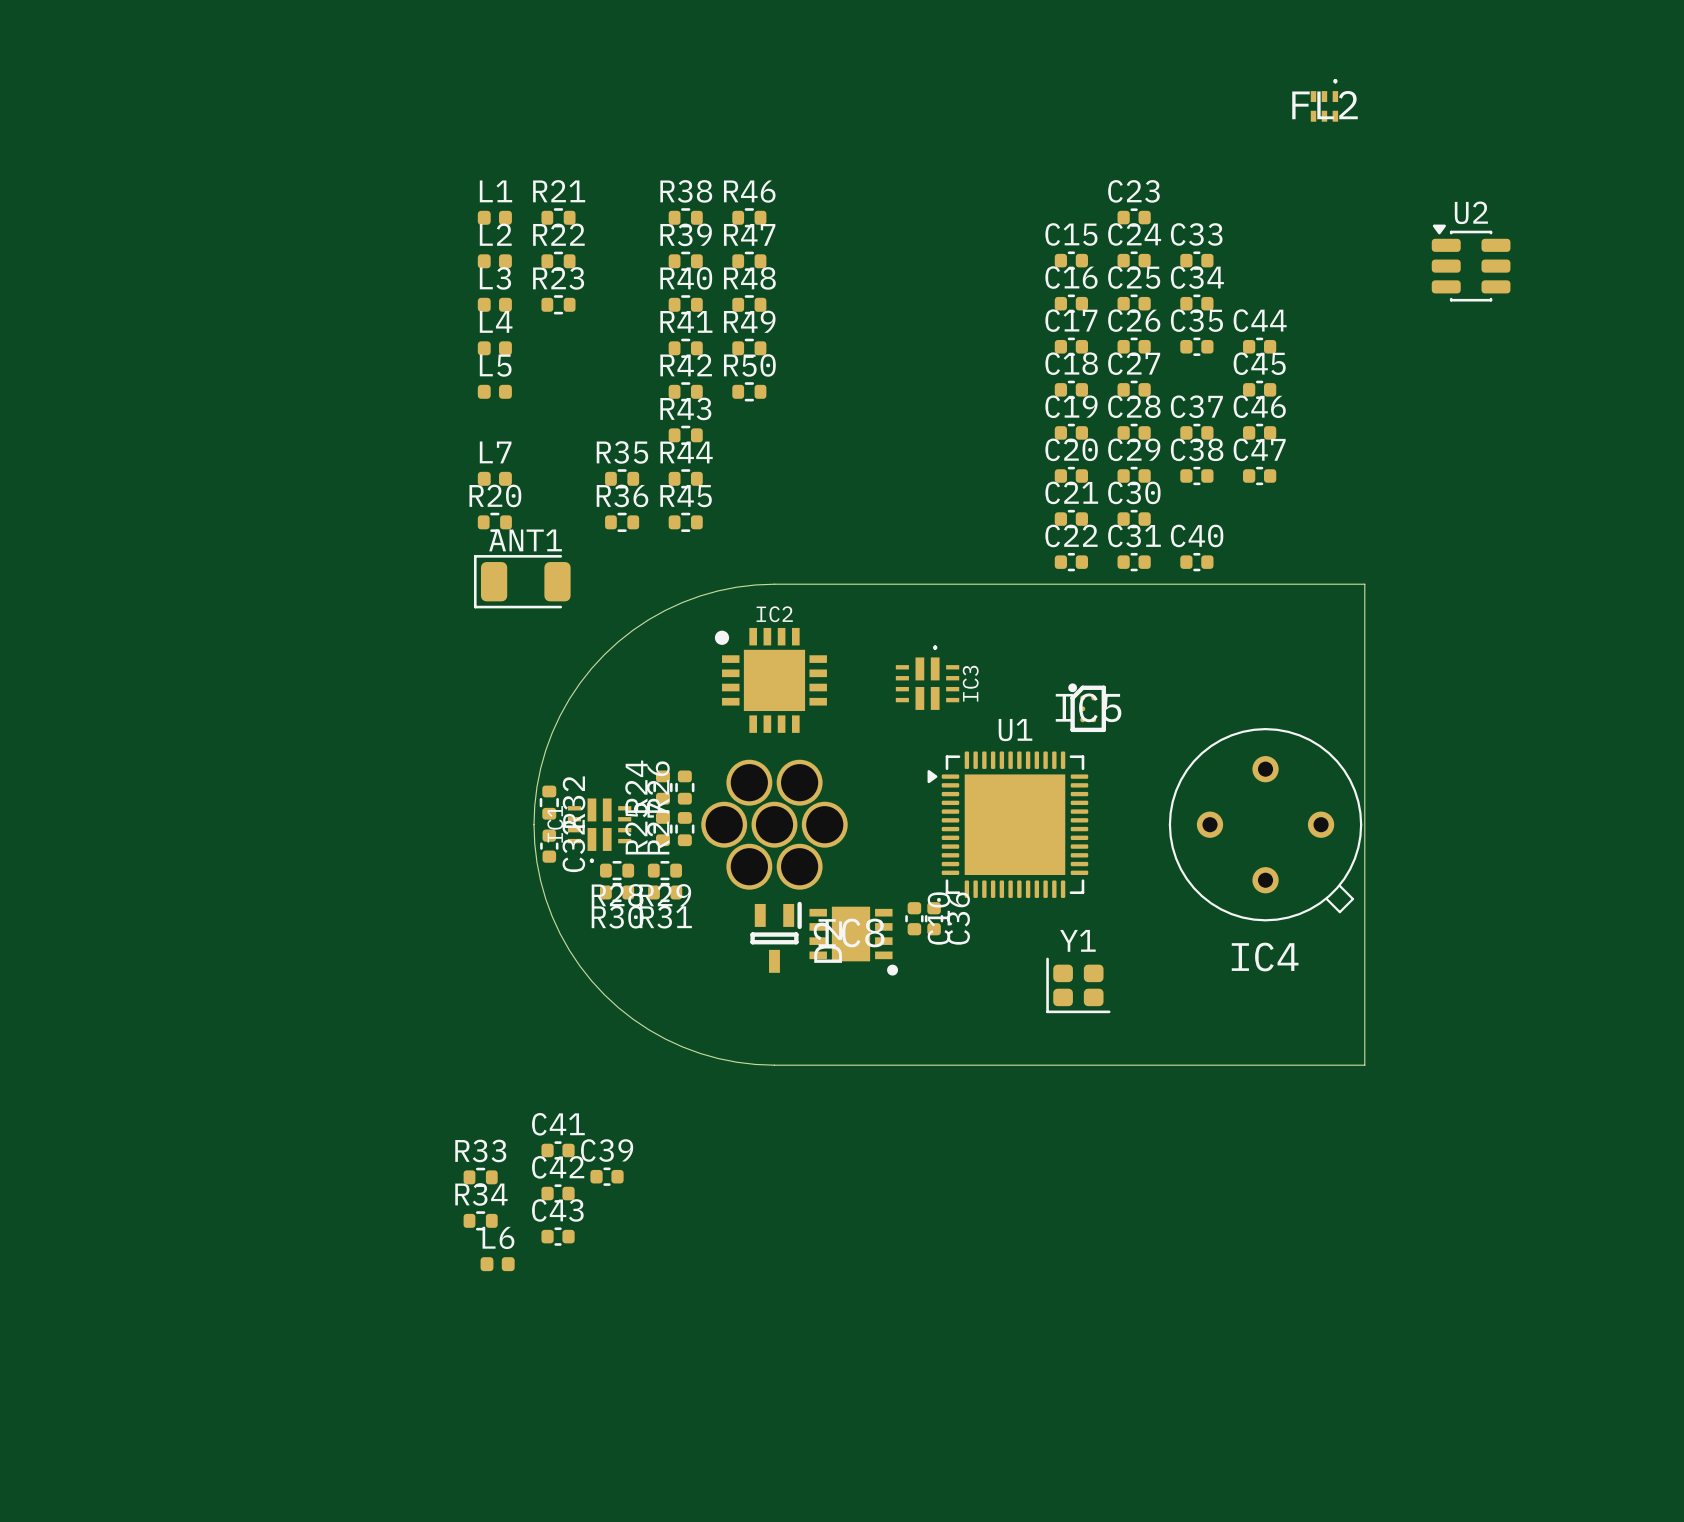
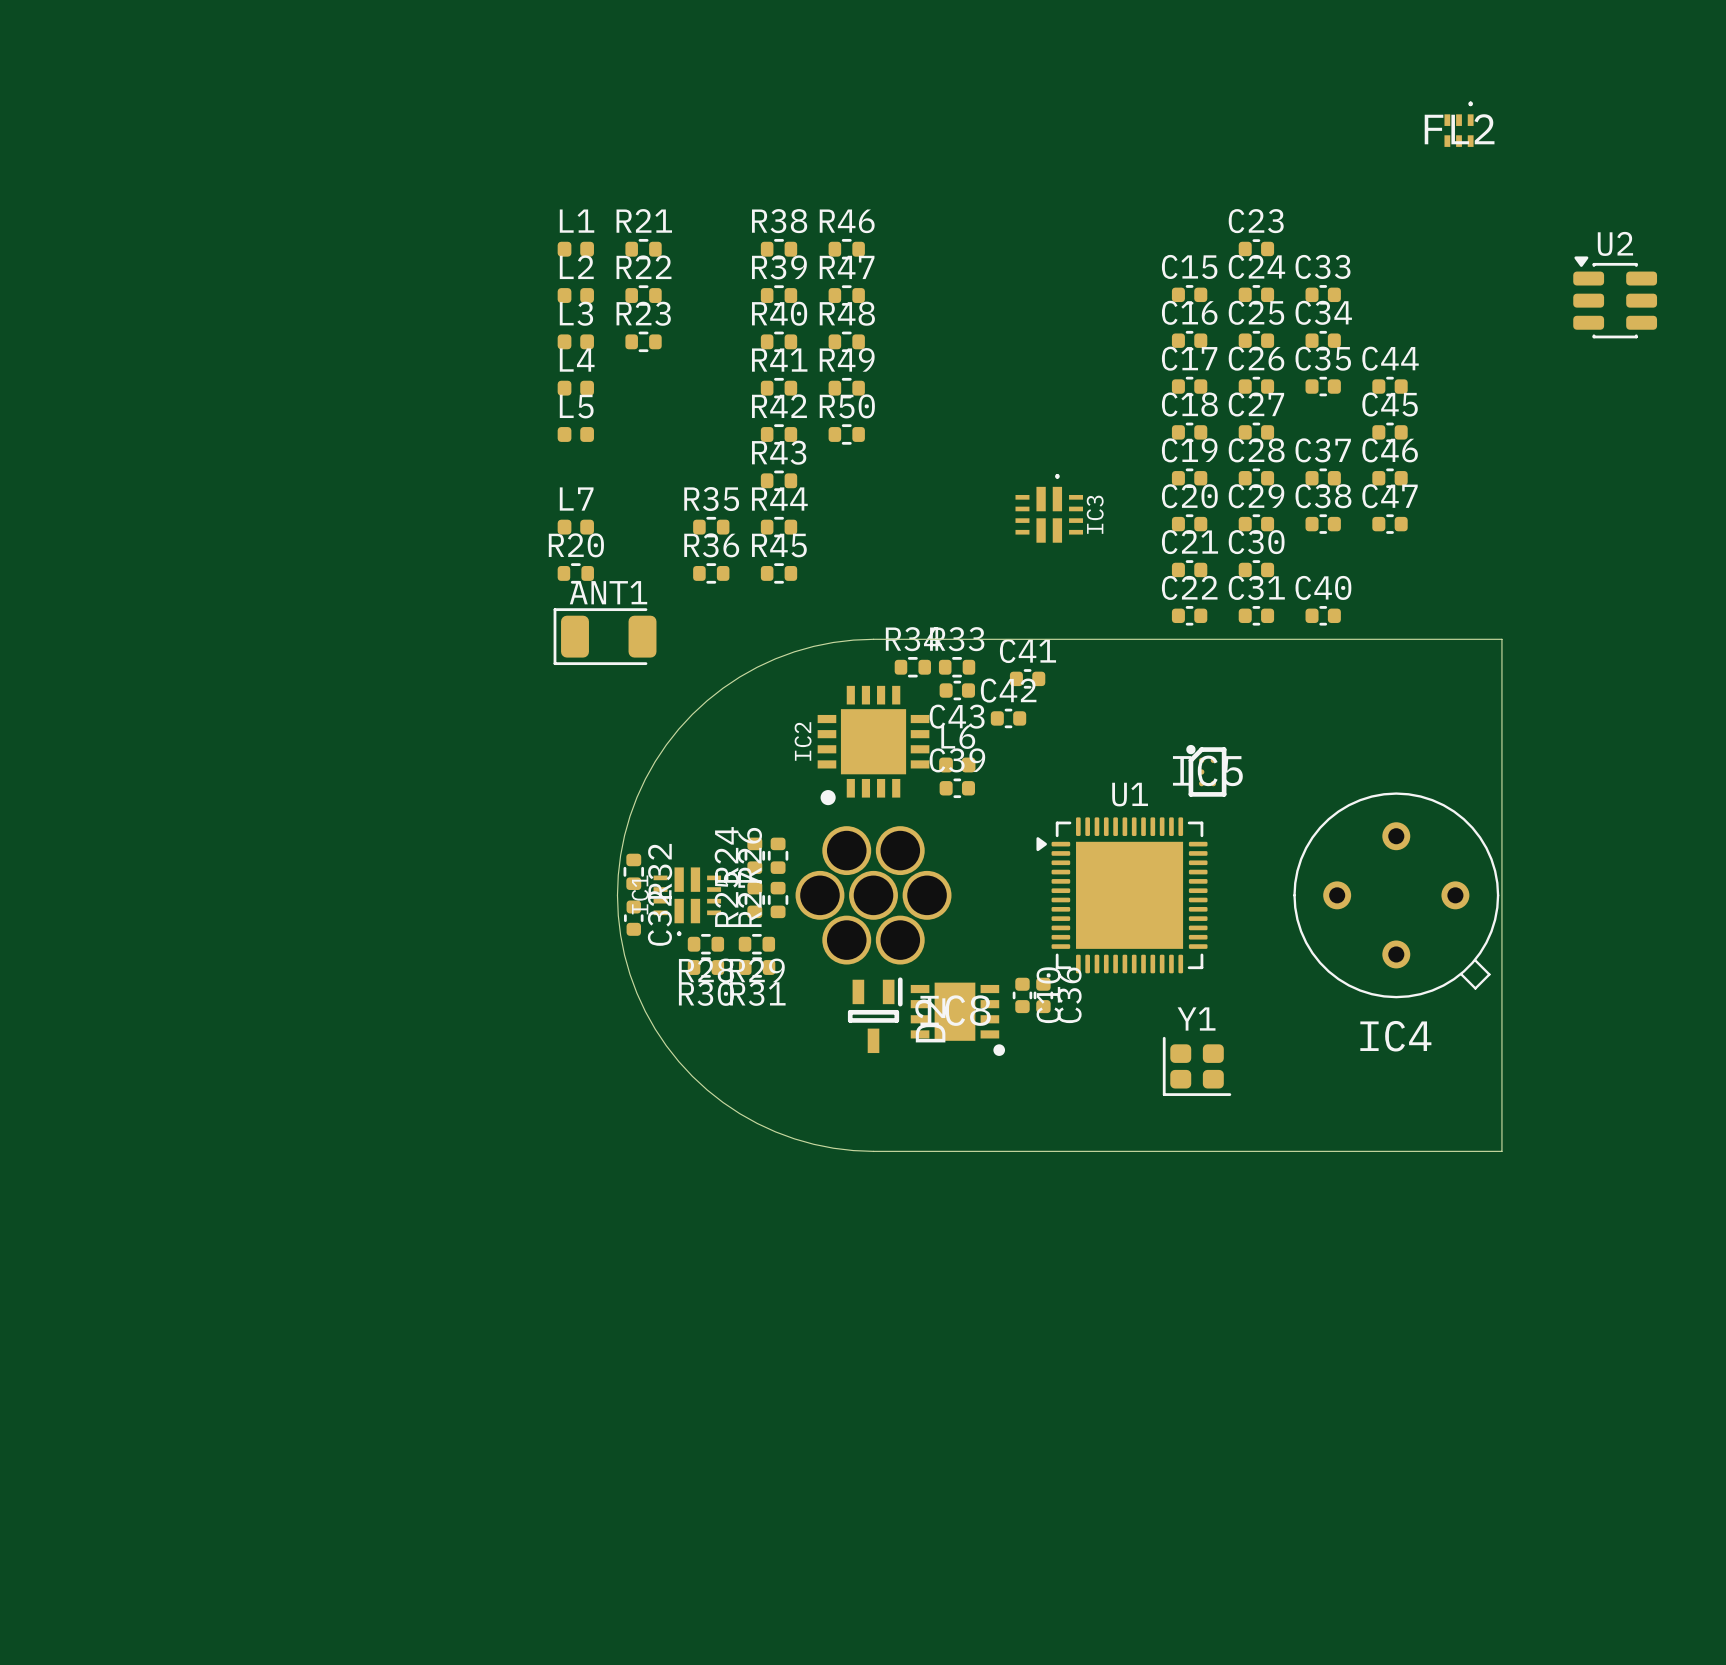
IC3 position: (927, 677) -> (1049, 508)
IC2 rotation: 0° (770, 680) -> 90° counterclockwise (873, 745)
C41 position: (558, 1150) -> (1027, 678)
C39 position: (607, 1176) -> (957, 788)
R33 position: (480, 1177) -> (957, 667)
C42 position: (558, 1193) -> (1008, 718)
C43 name position: C43 (557, 1210) -> C43 (957, 716)
R34 position: (480, 1220) -> (912, 667)
C43 position: (558, 1236) -> (957, 690)
L6 position: (497, 1264) -> (957, 765)

